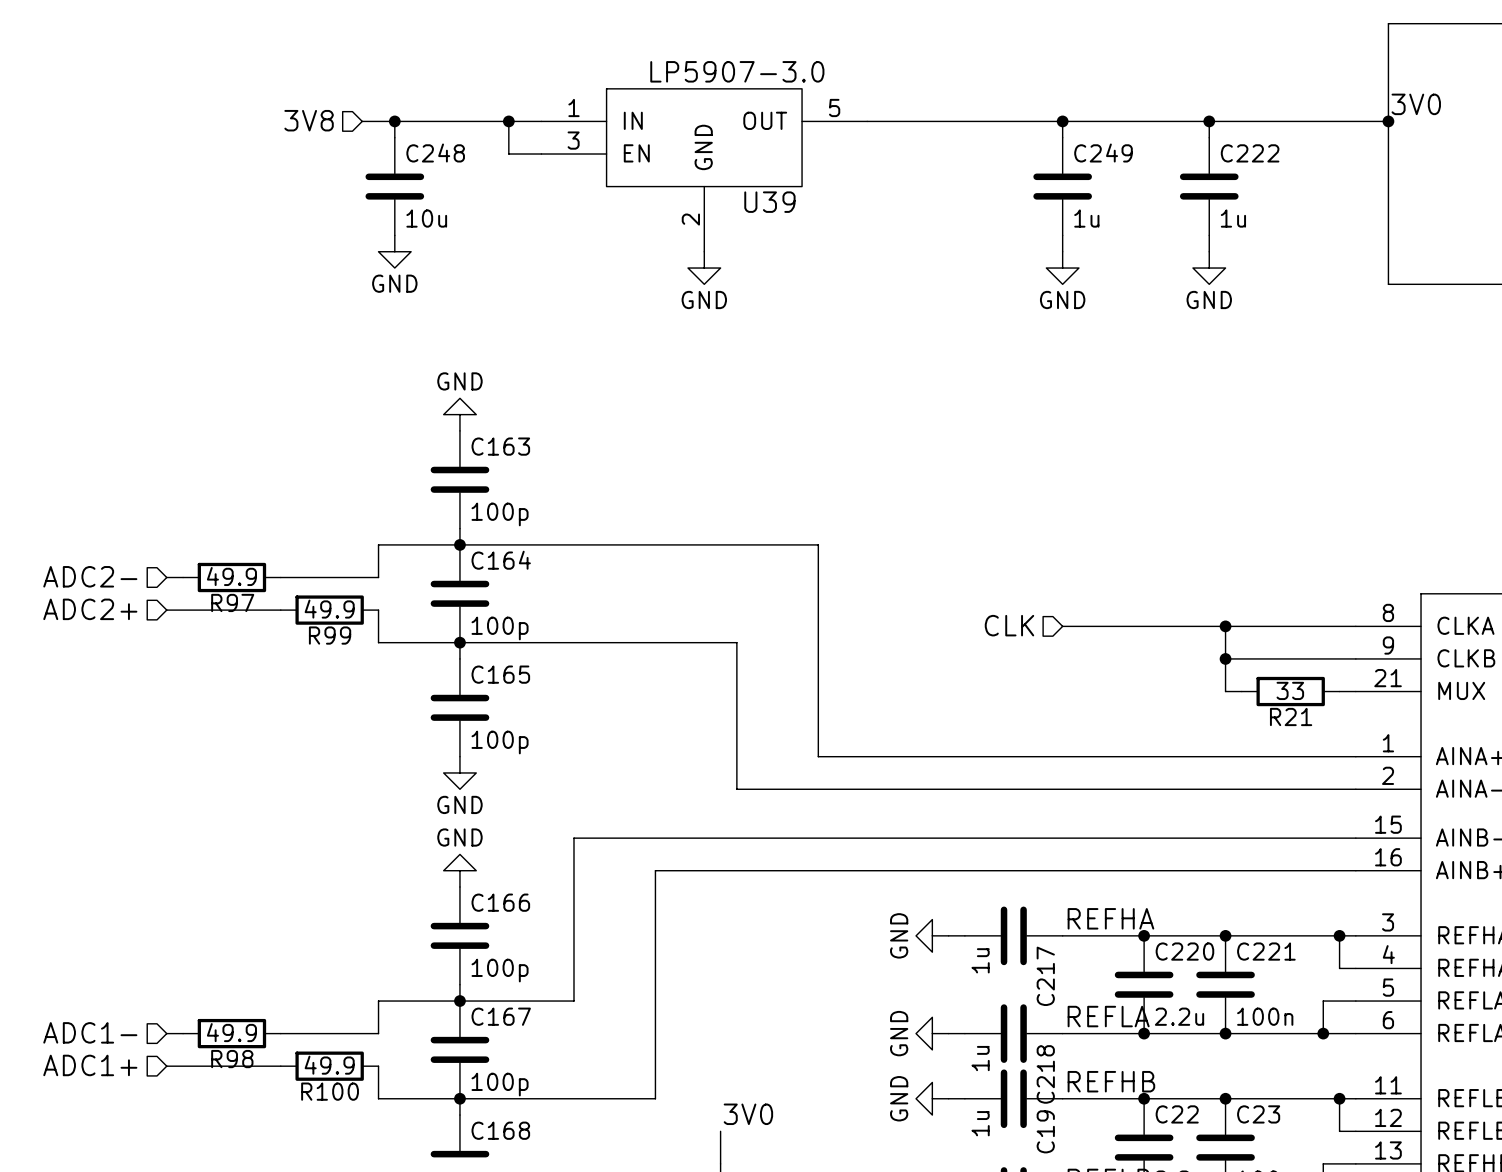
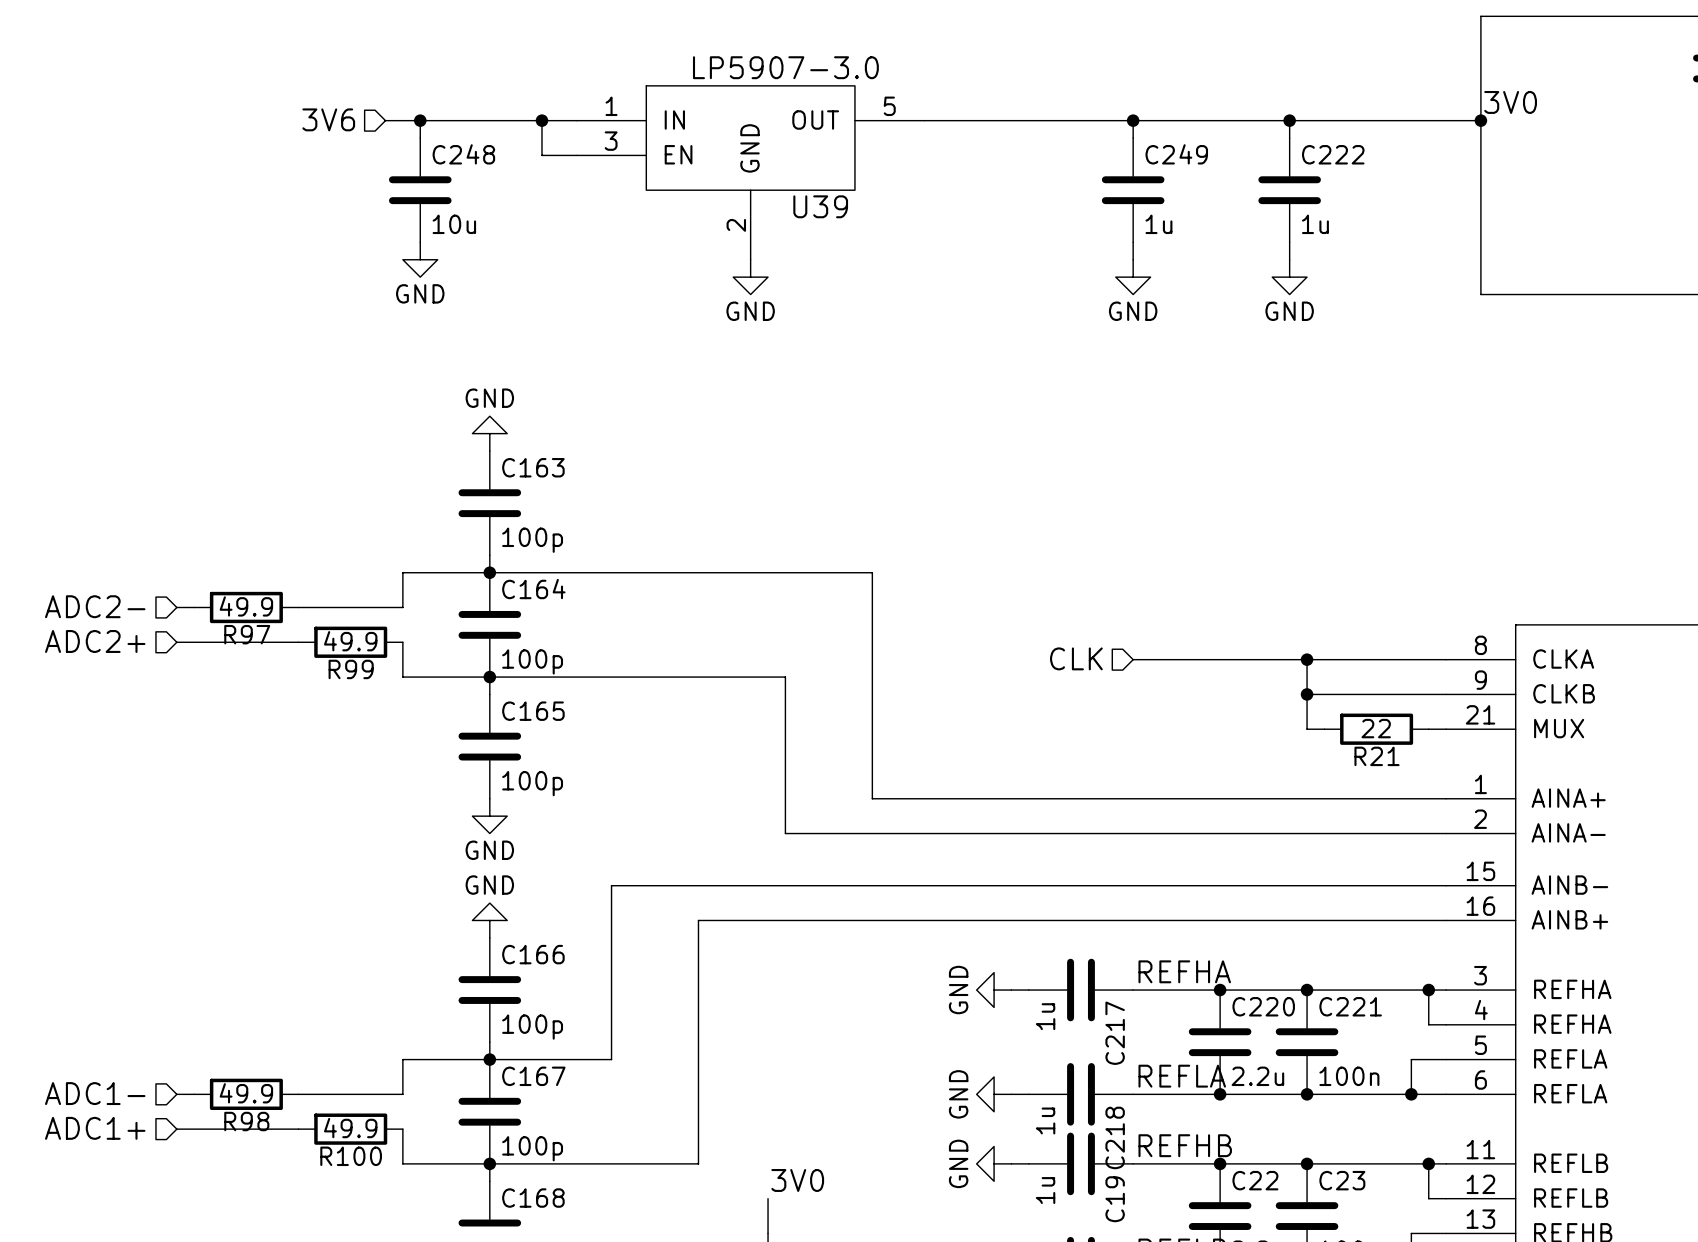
hierarchical label: 3V8 (309, 120) -> 3V6 (328, 119)
R21 value: 33 (1290, 690) -> 22 (1376, 728)

